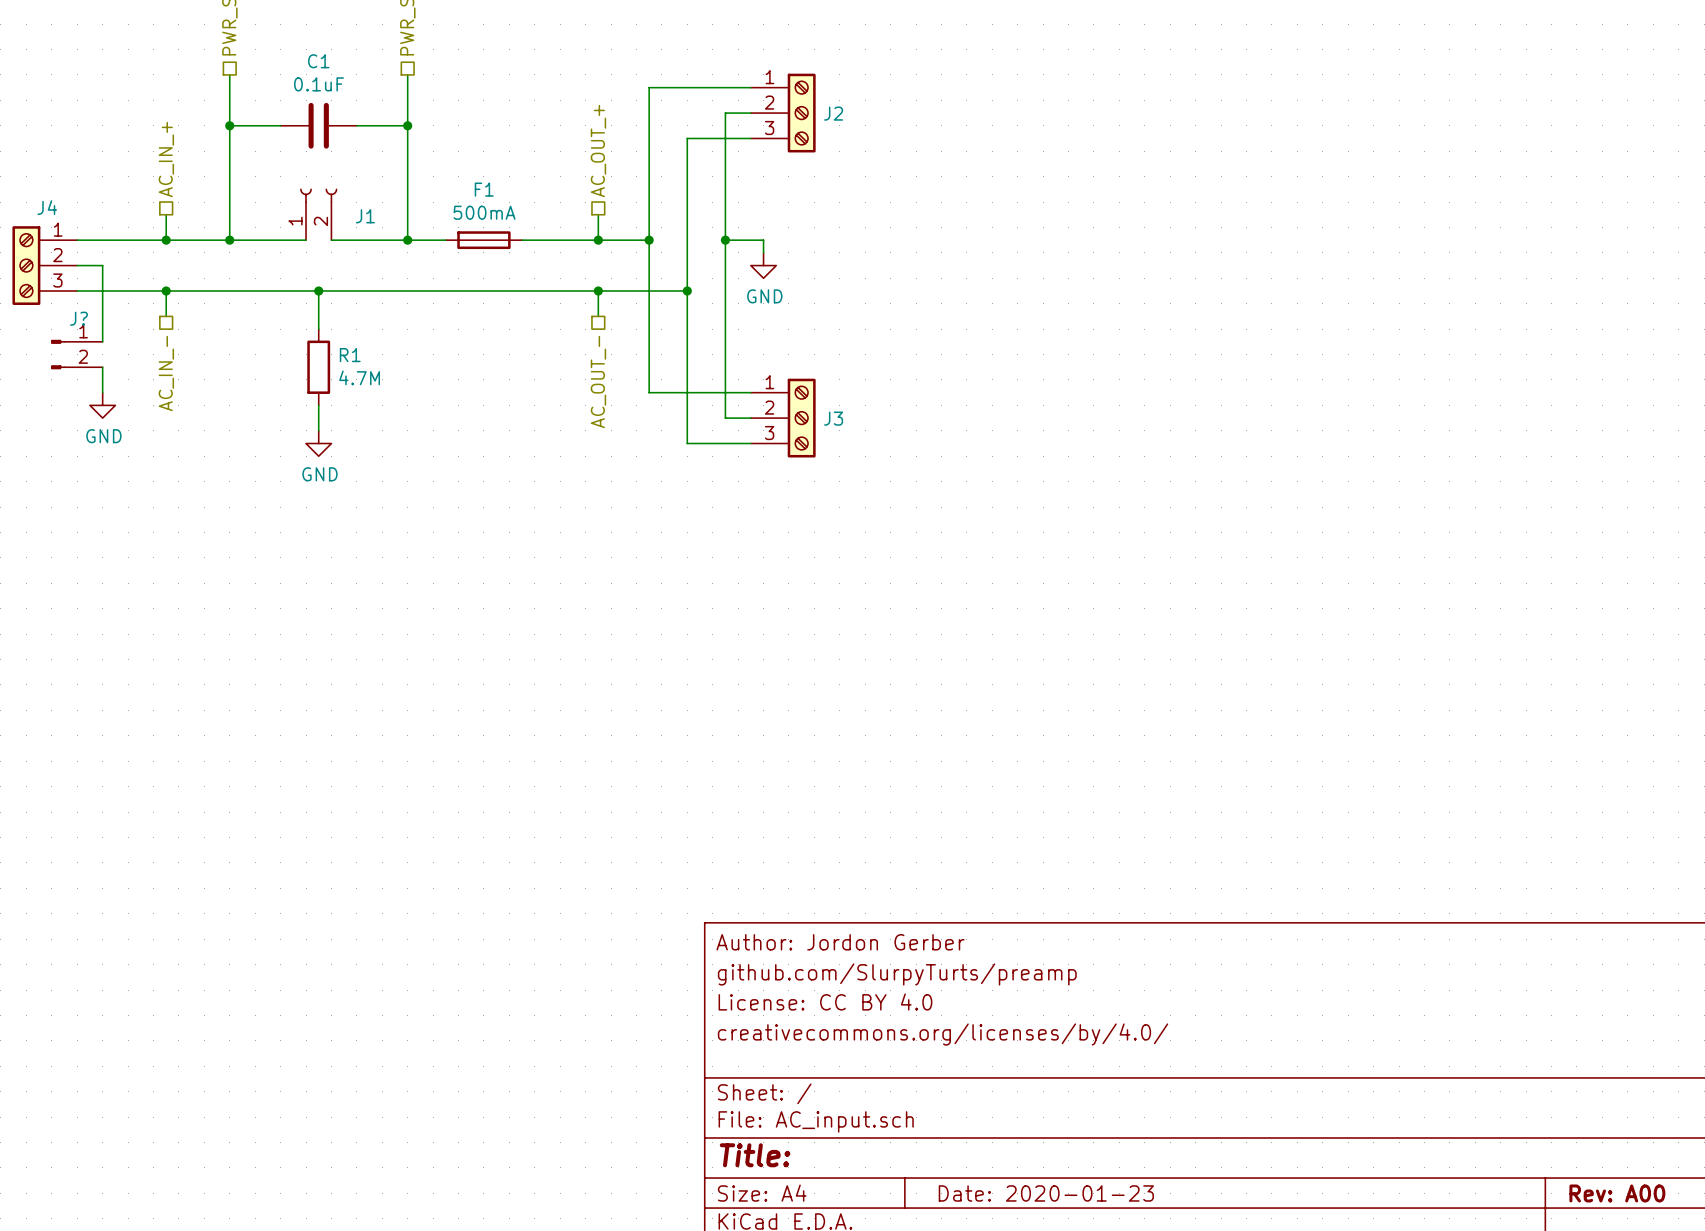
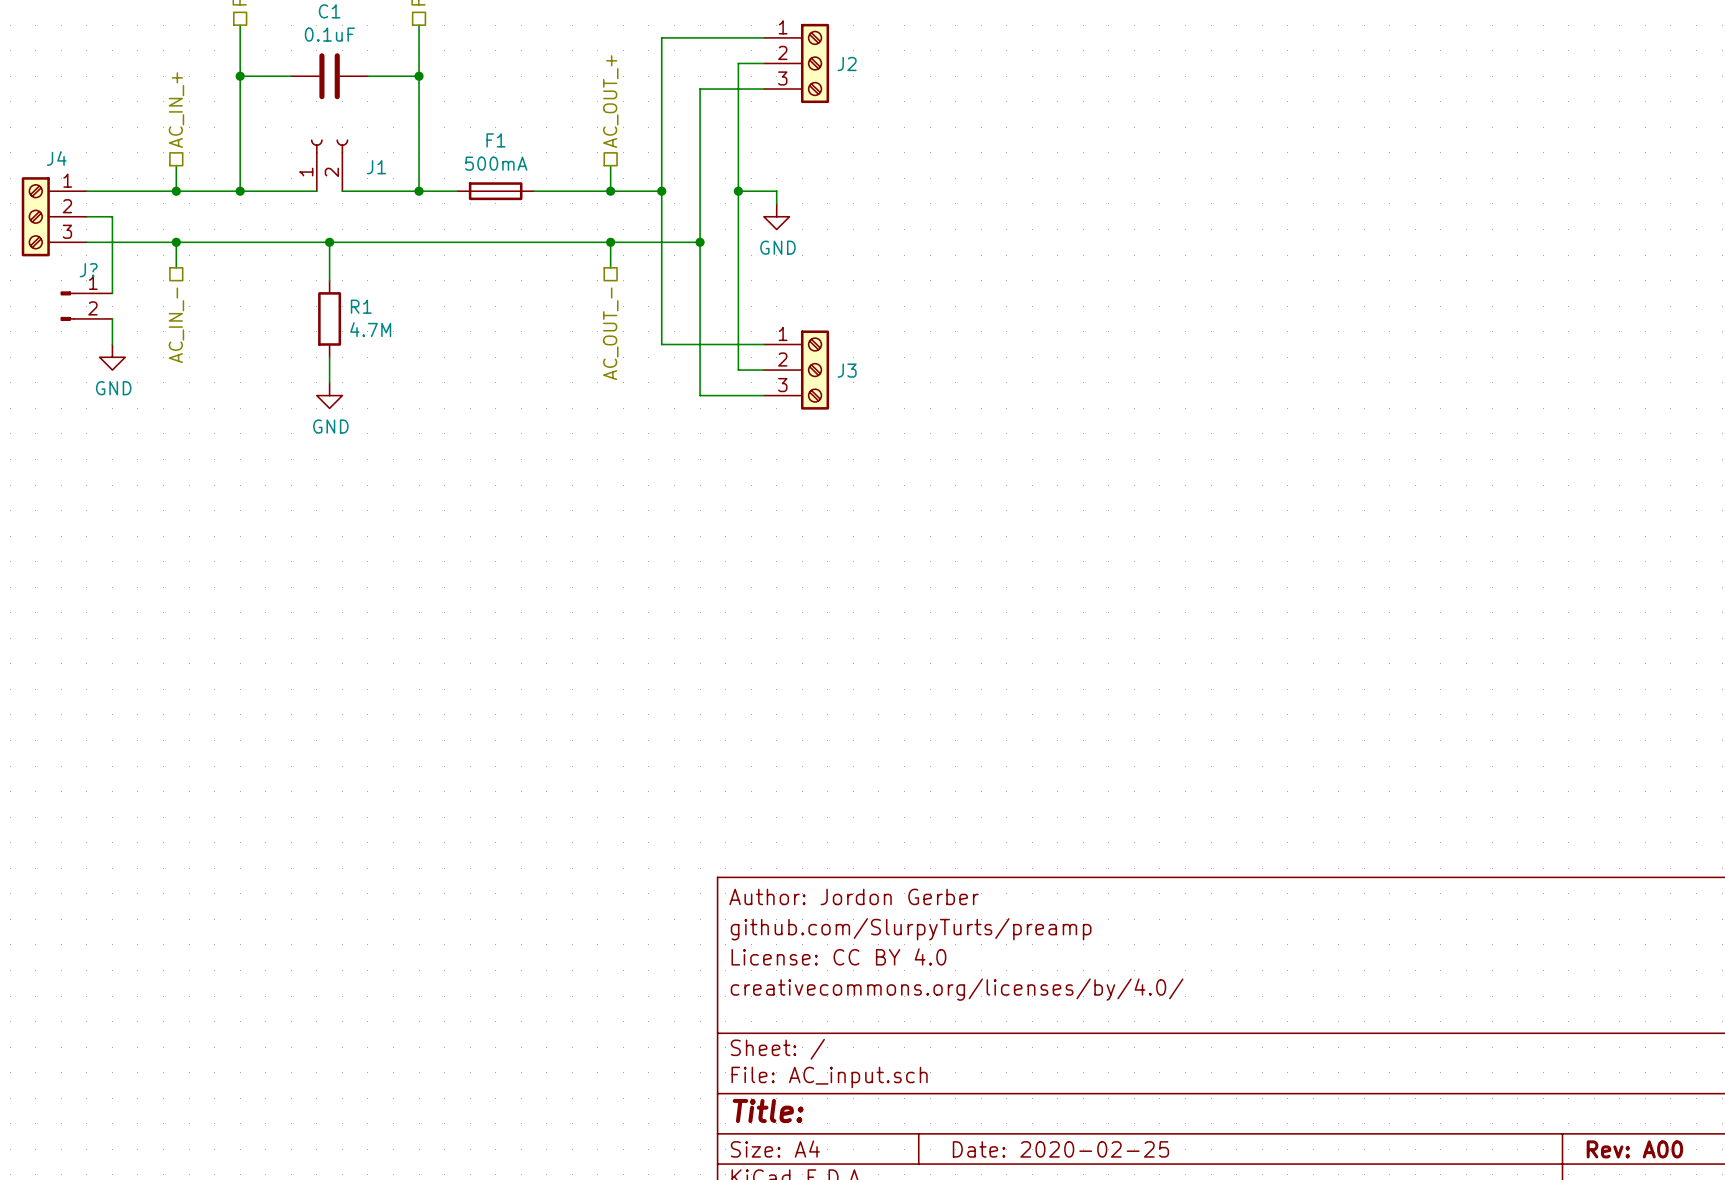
title block: Date: 2020-01-23 (1046, 1193) -> Date: 2020-02-25 (1060, 1149)

